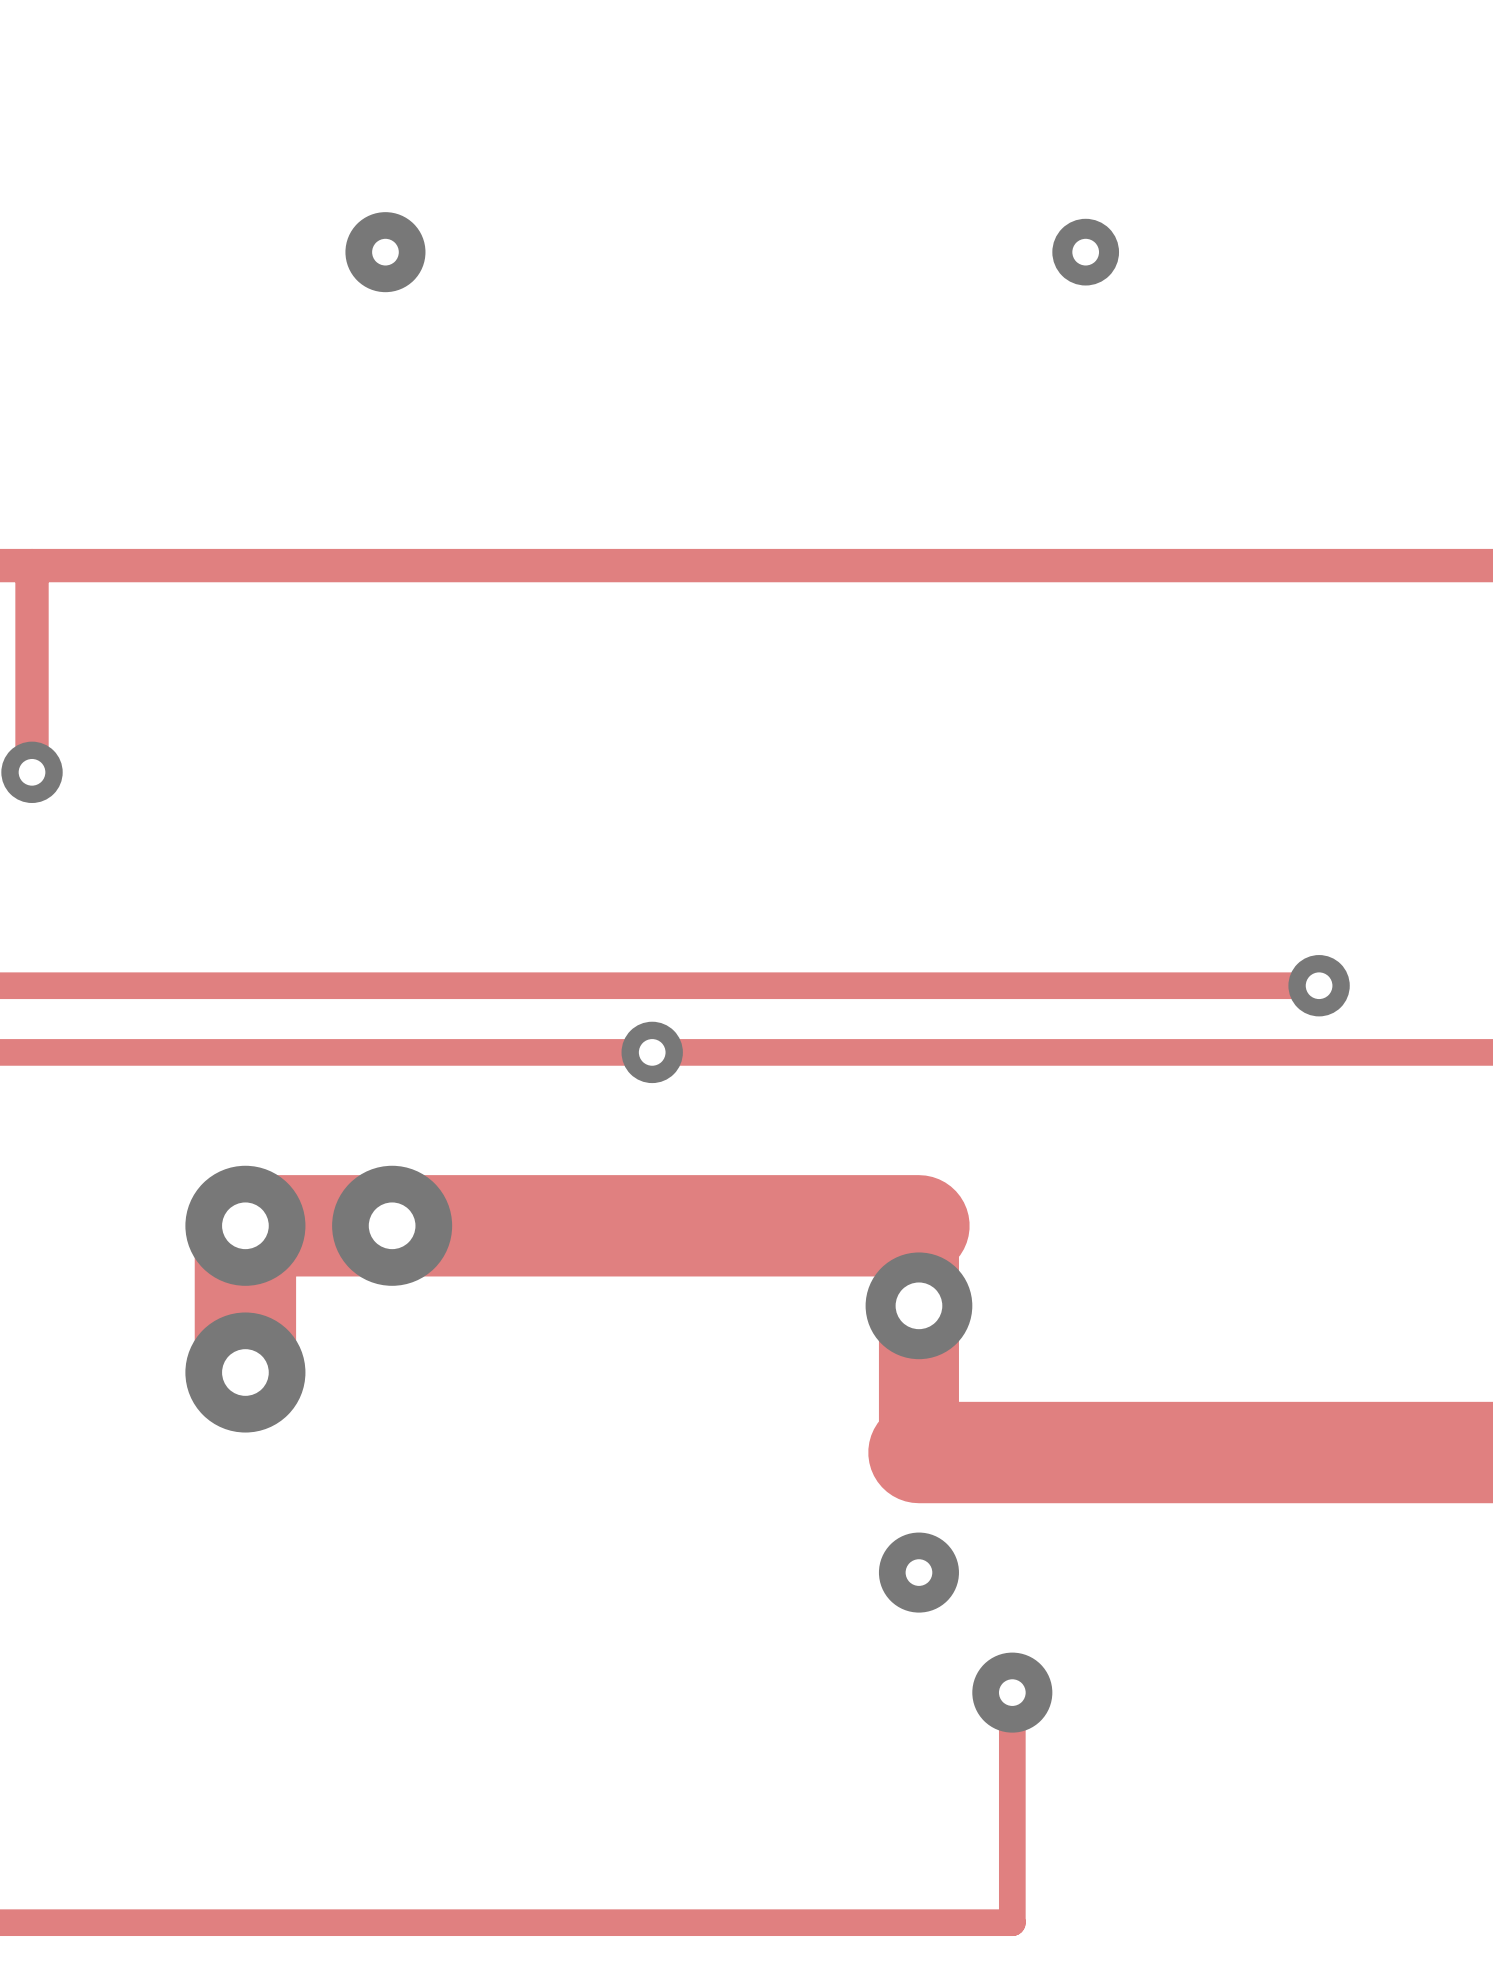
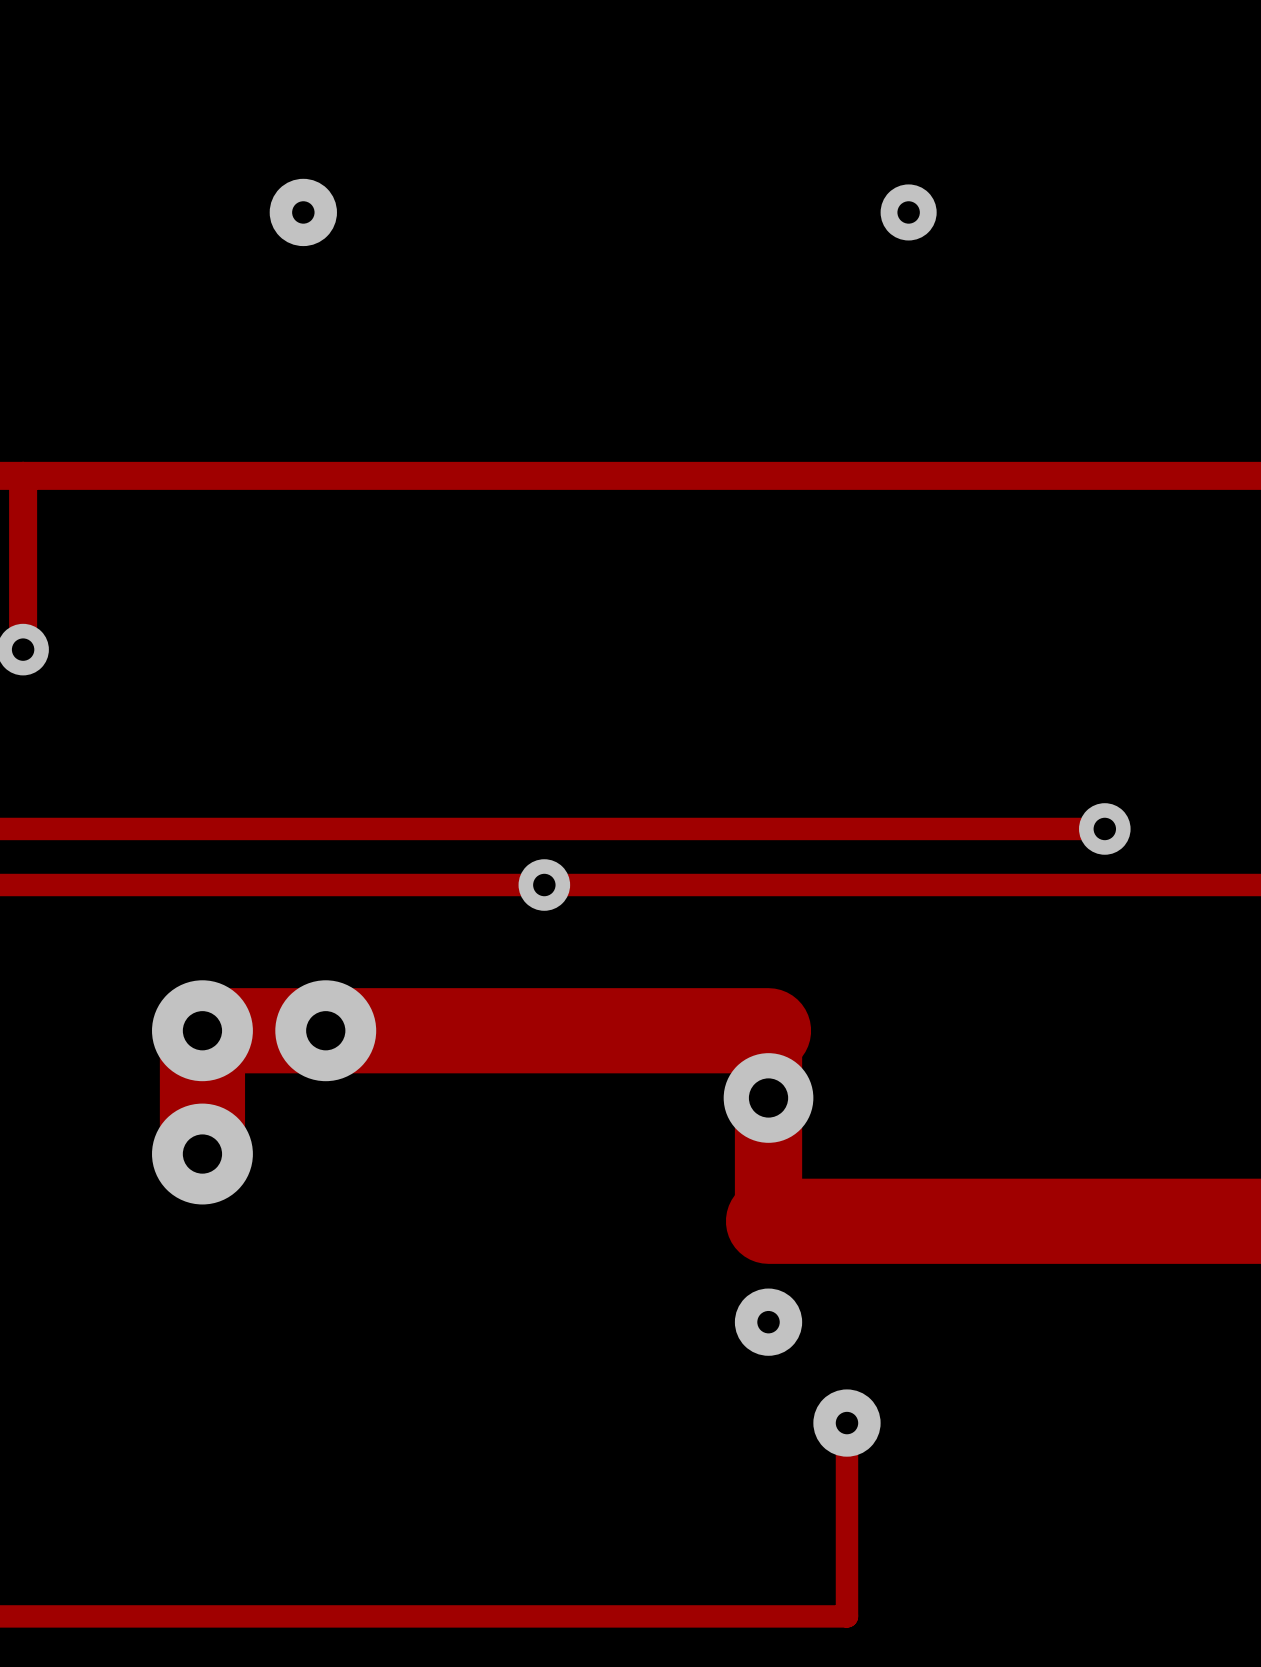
via position: (385, 252) -> (303, 212)

